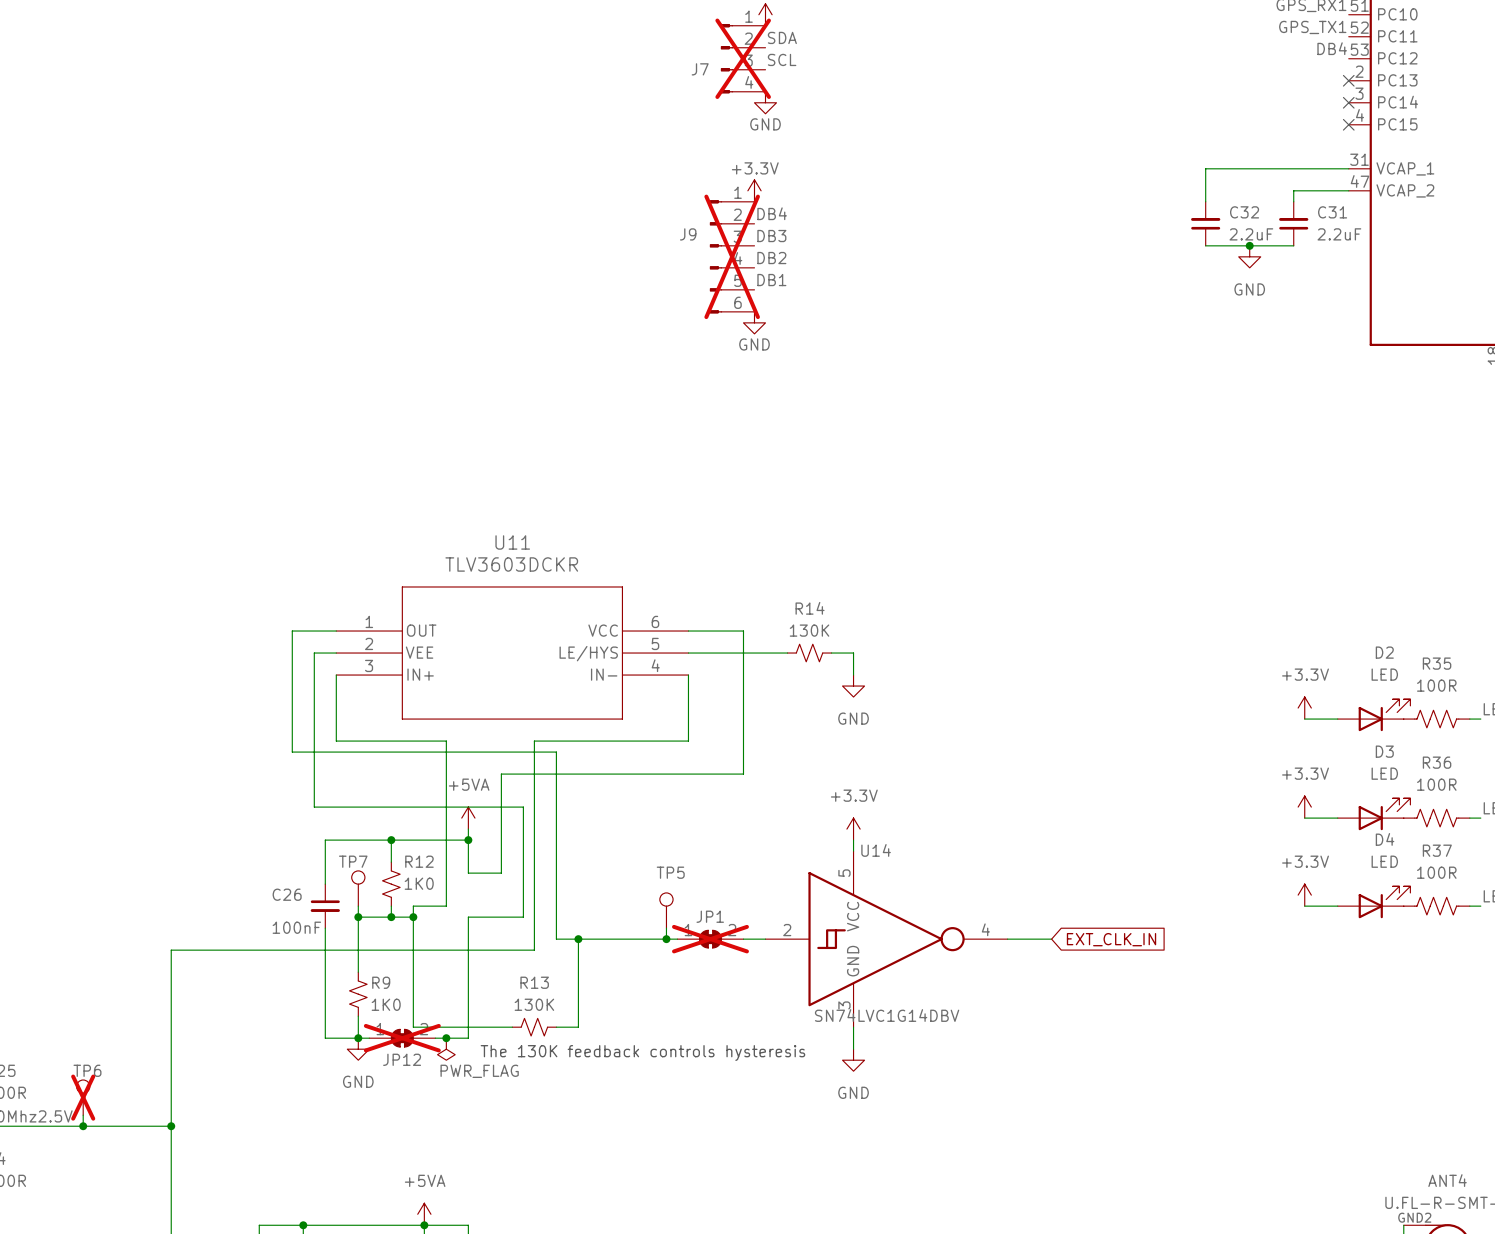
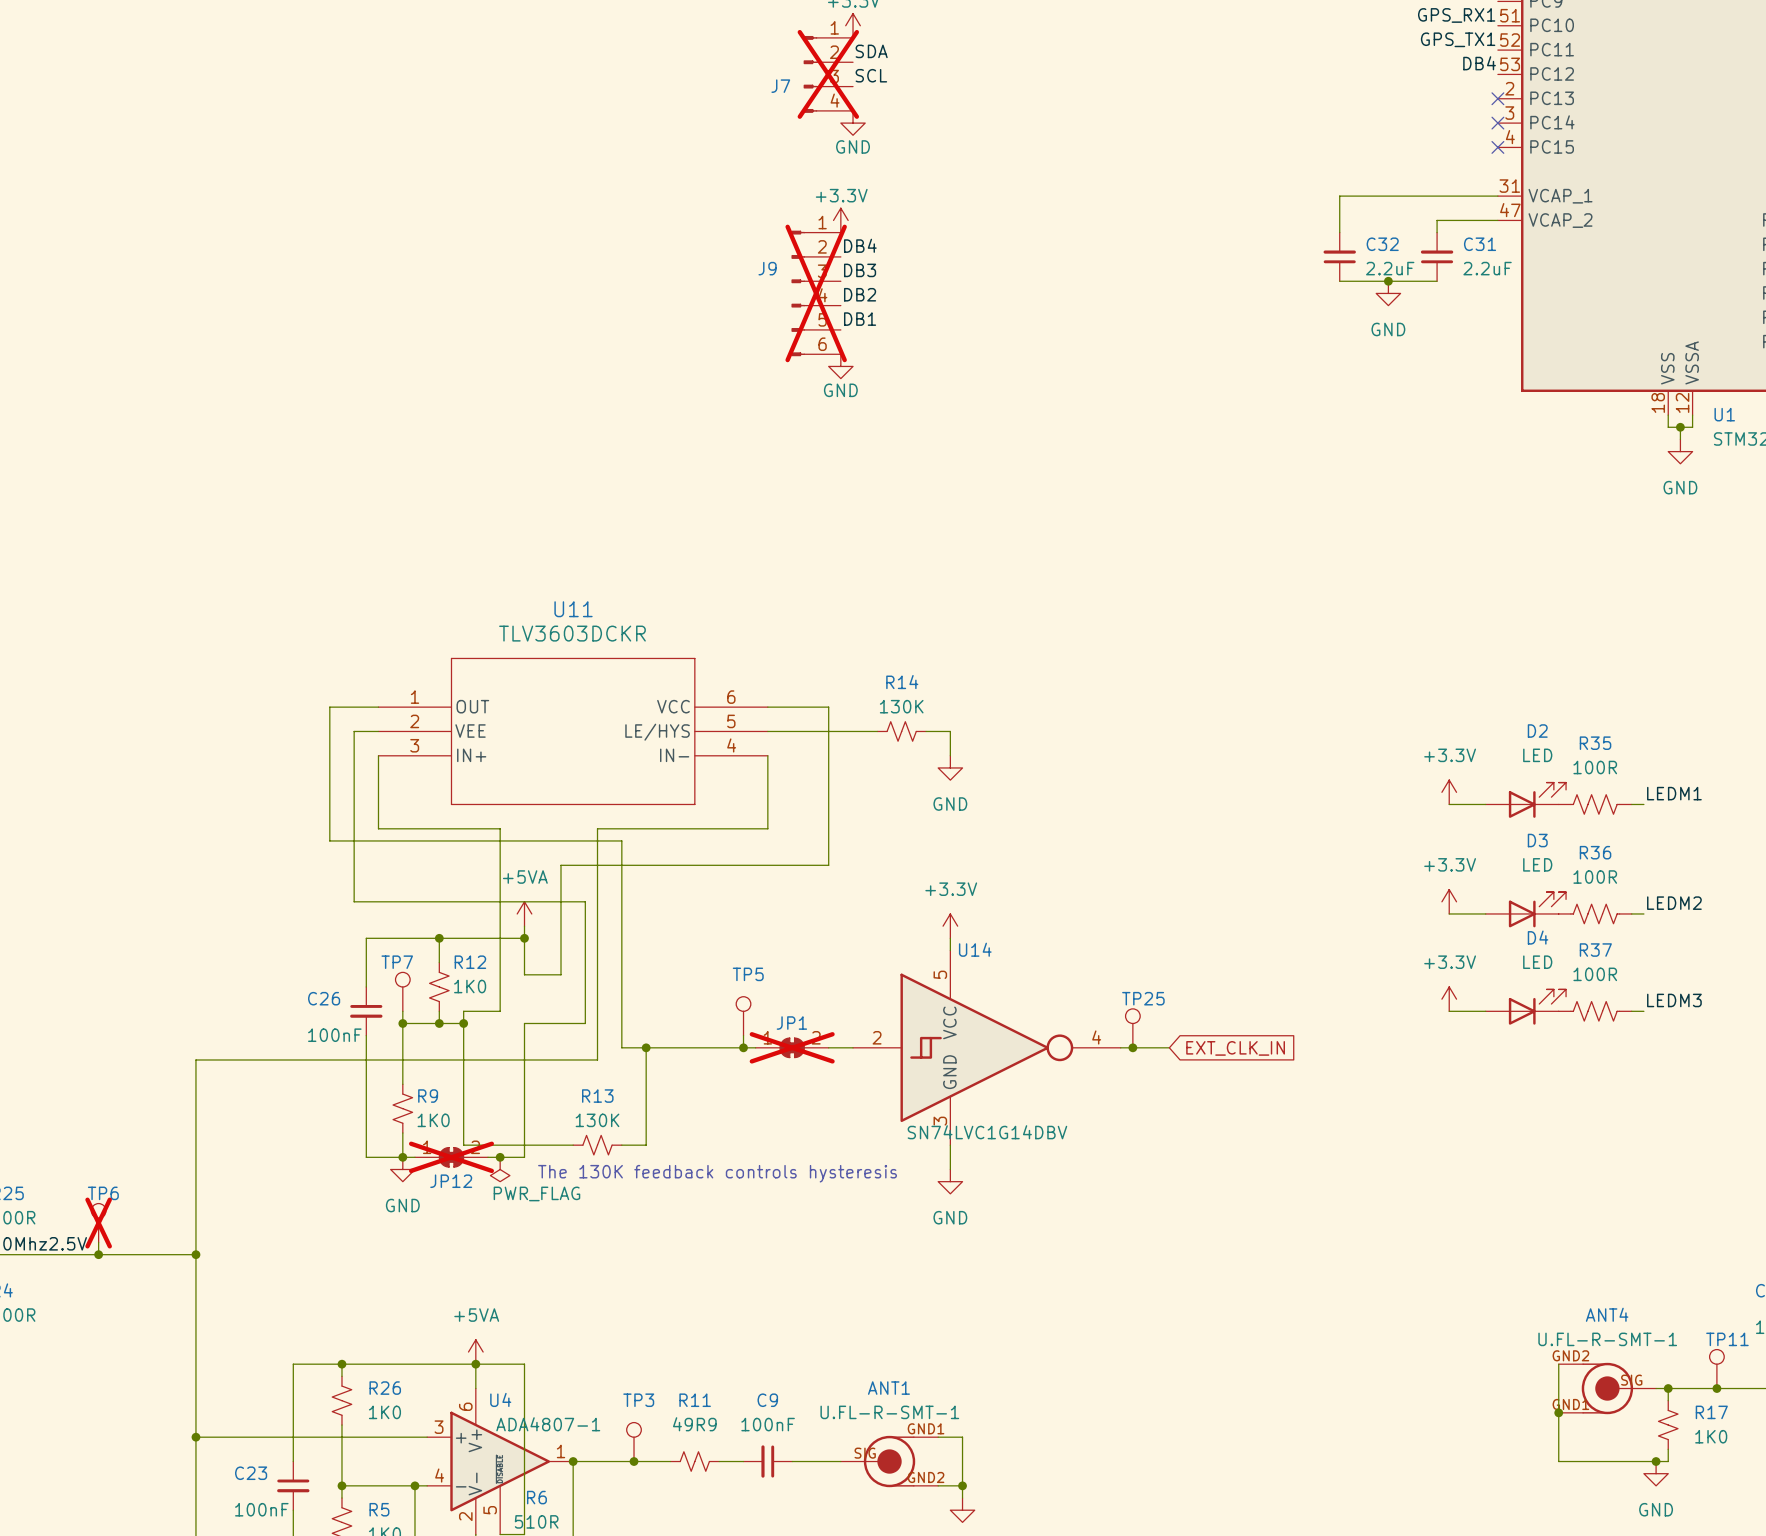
TP25: none -> (1132, 1028)
junction: none -> (1132, 1047)

